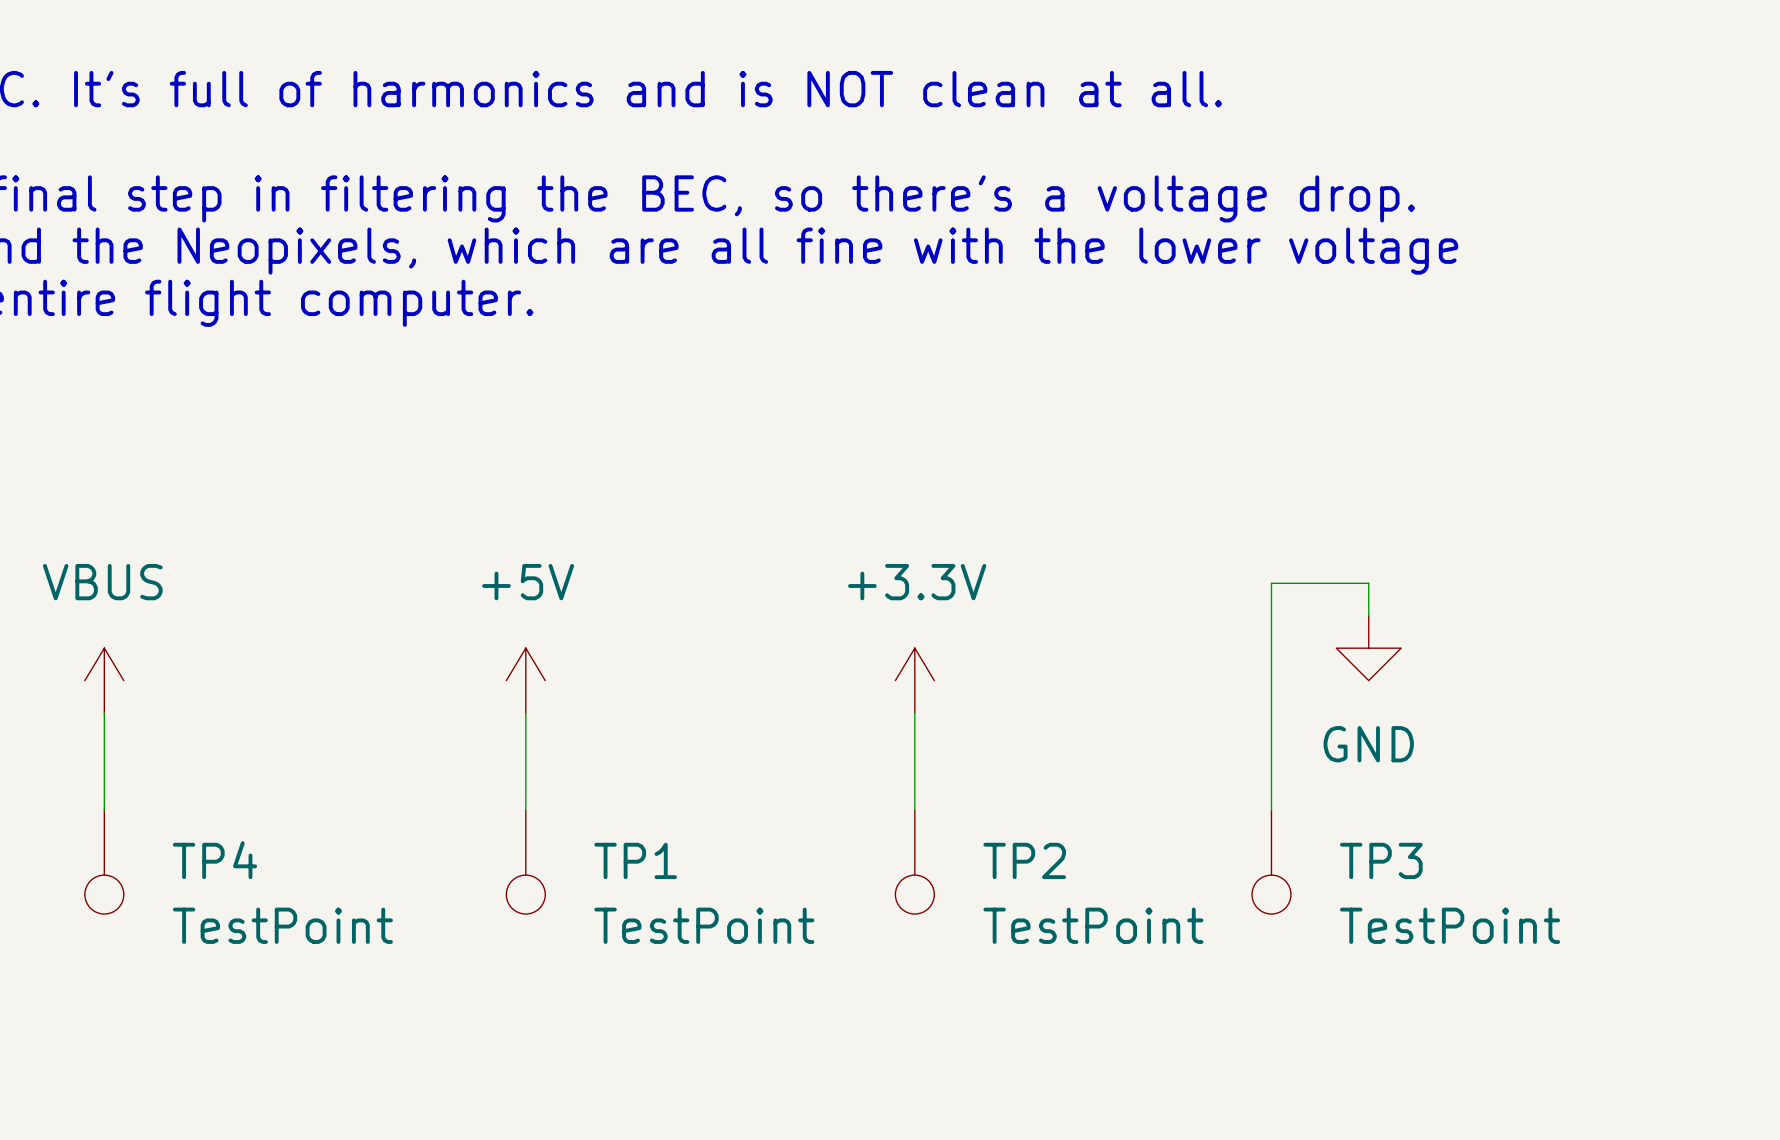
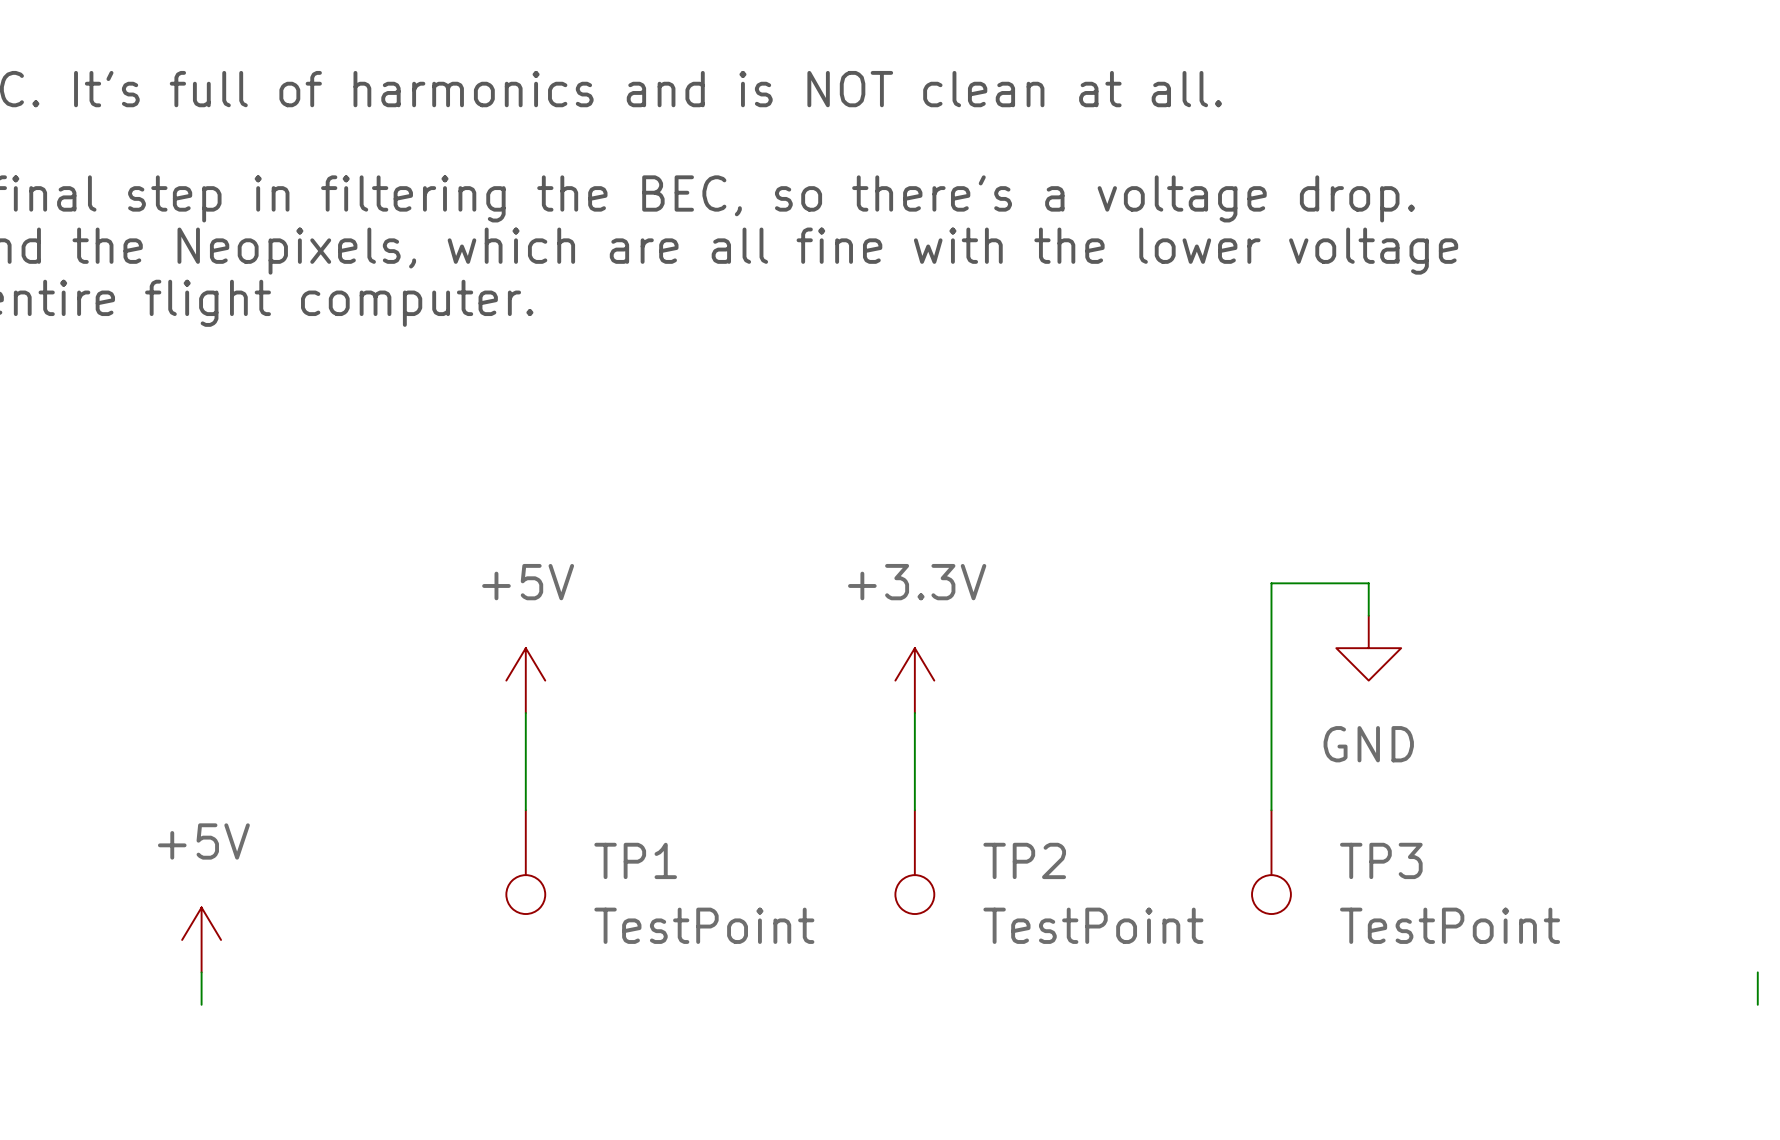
power symbol: VBUS (104, 680) -> none
wire: (104, 713) (104, 810) -> none
TP4: TestPoint (104, 862) -> none
power symbol: none -> +5V (201, 939)
wire: none -> (201, 972) (201, 1004)
wire: none -> (1757, 972) (1757, 1004)

